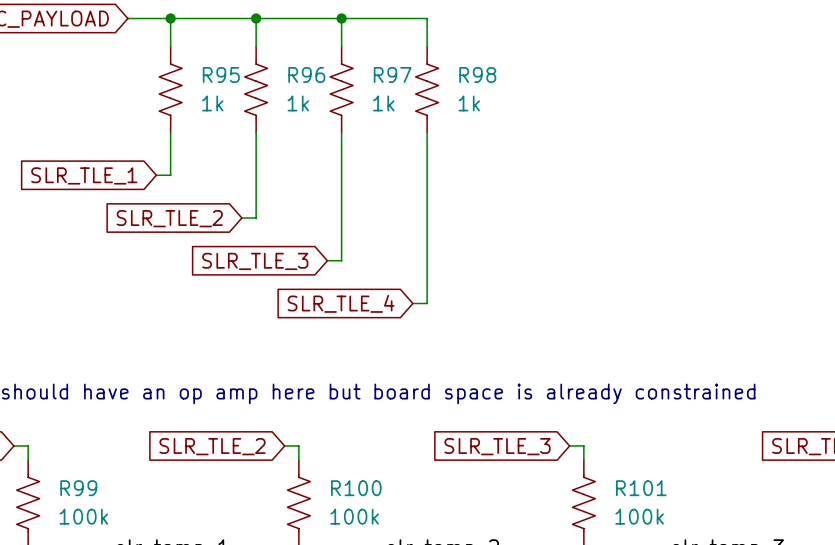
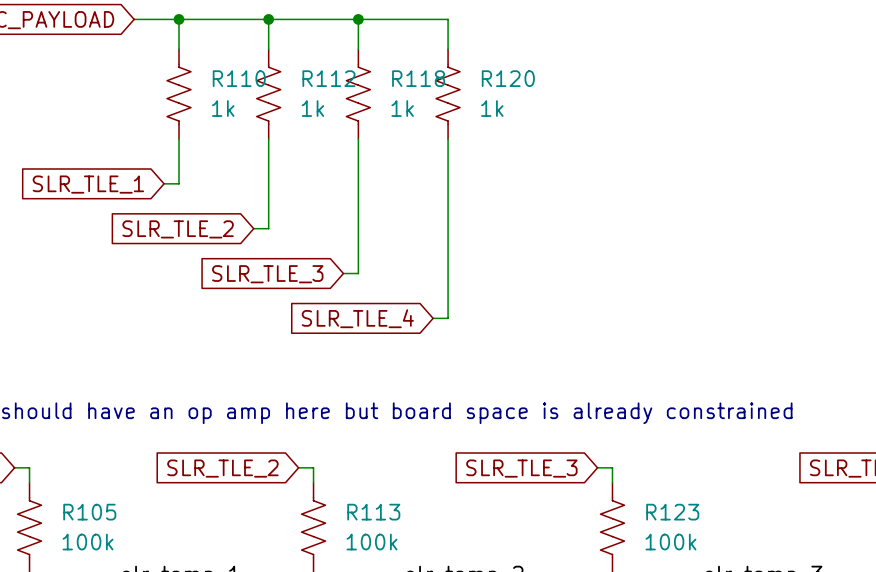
R95 name: R95 (221, 74) -> R110 (239, 78)
R96 name: R96 (306, 74) -> R112 (328, 78)
R97 name: R97 (392, 74) -> R118 (418, 78)
R98 name: R98 (477, 74) -> R120 (508, 78)
R99 name: R99 (78, 488) -> R105 (89, 512)
R100 name: R100 (356, 488) -> R113 (373, 512)
R101 name: R101 (641, 488) -> R123 (672, 512)

